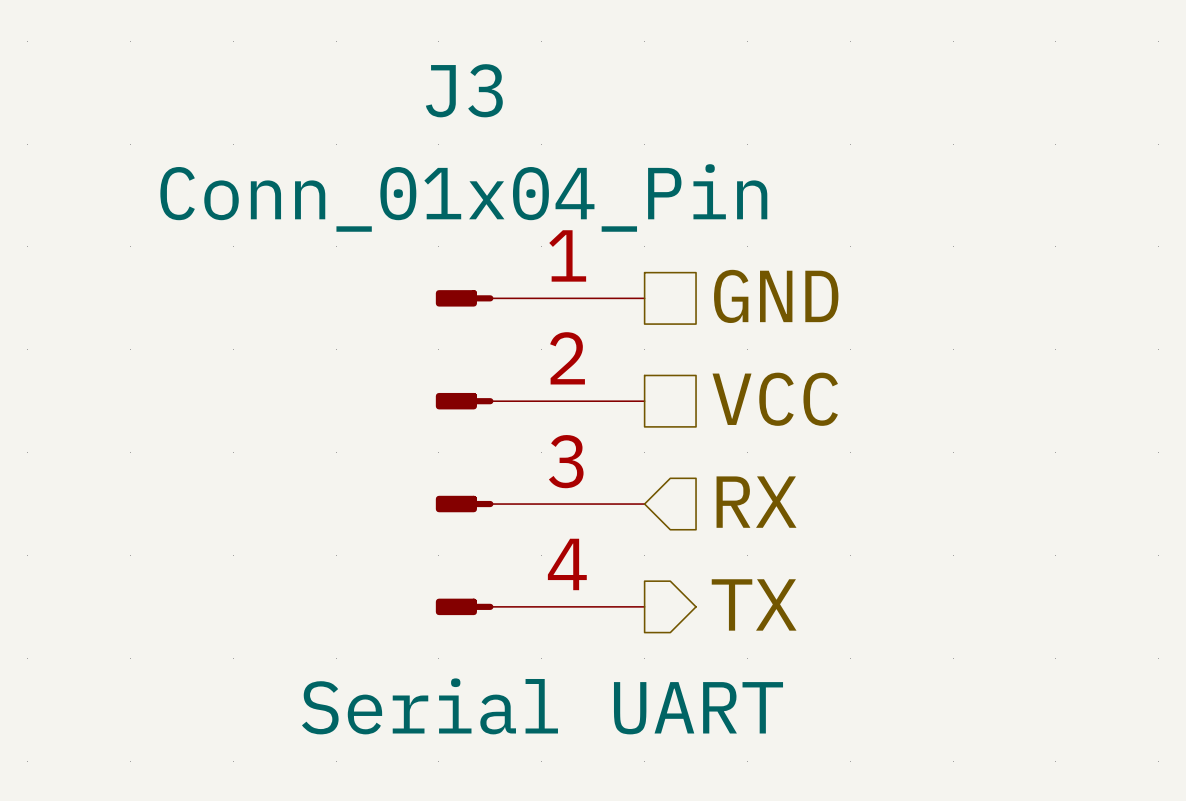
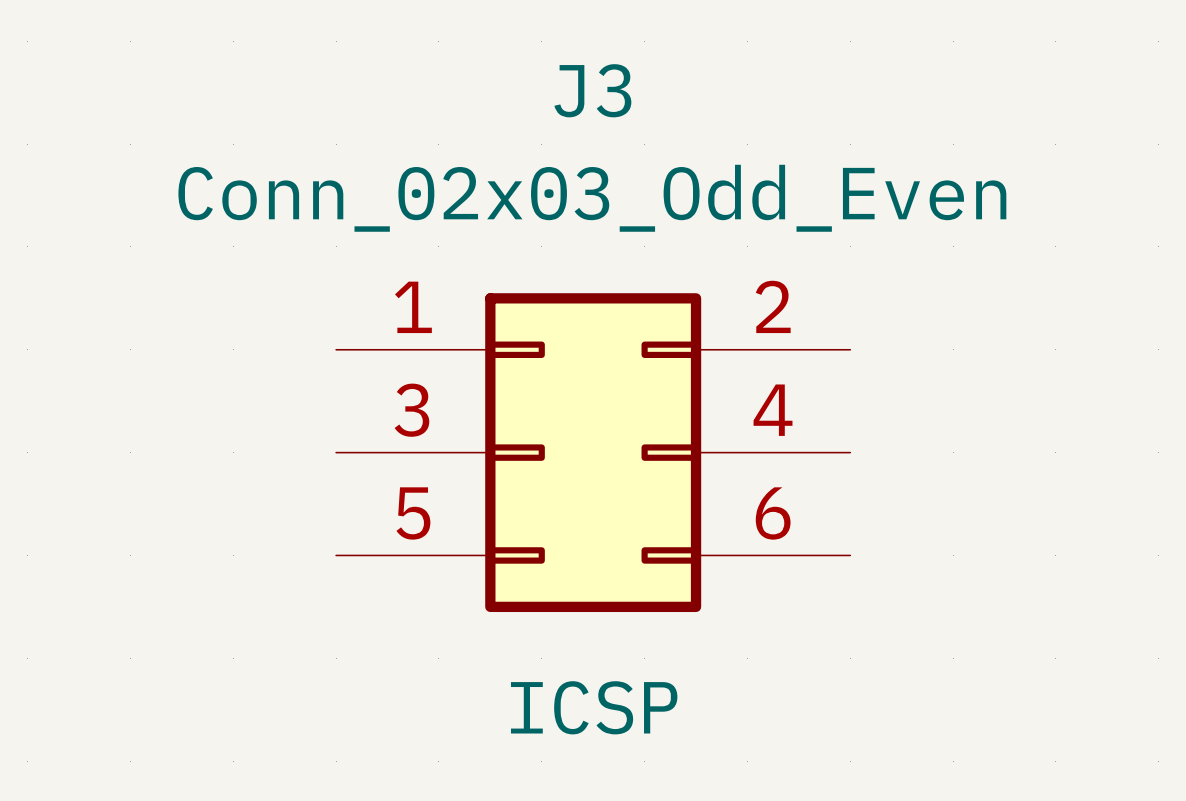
J3 value: Conn_01x04_Pin (463, 197) -> Conn_02x03_Odd_Even (592, 198)
J3 symbol: [435, 290, 645, 616] -> [336, 293, 851, 613]
hierarchical label: GND (776, 296) -> none
hierarchical label: VCC (775, 399) -> none
hierarchical label: RX (756, 502) -> none
hierarchical label: TX (754, 604) -> none
J3 text: Serial UART (542, 706) -> ICSP (594, 707)

